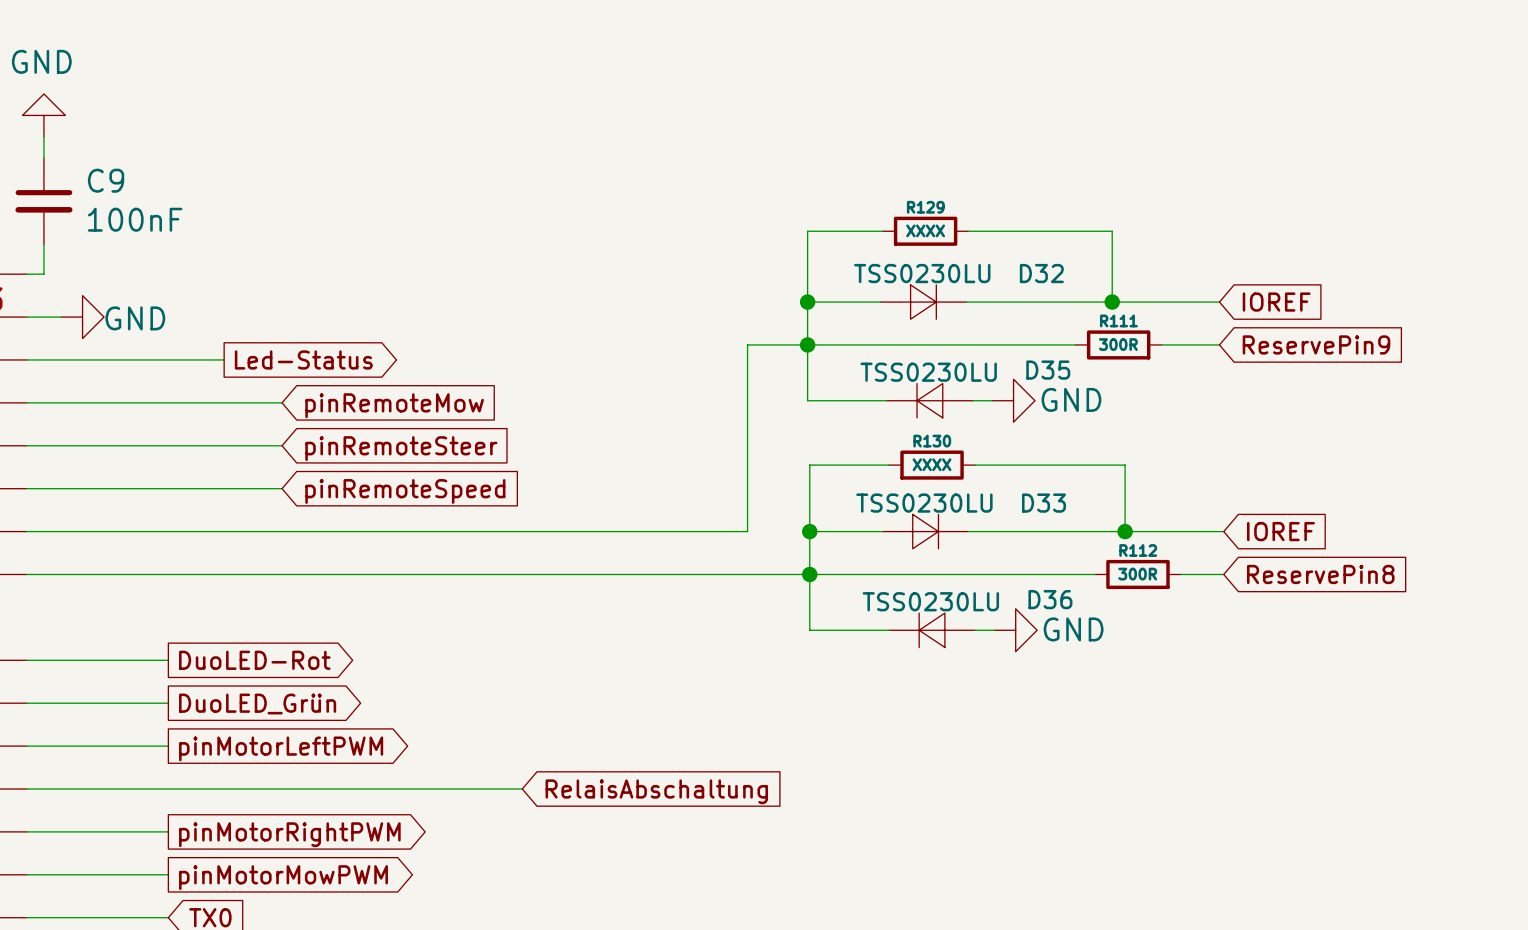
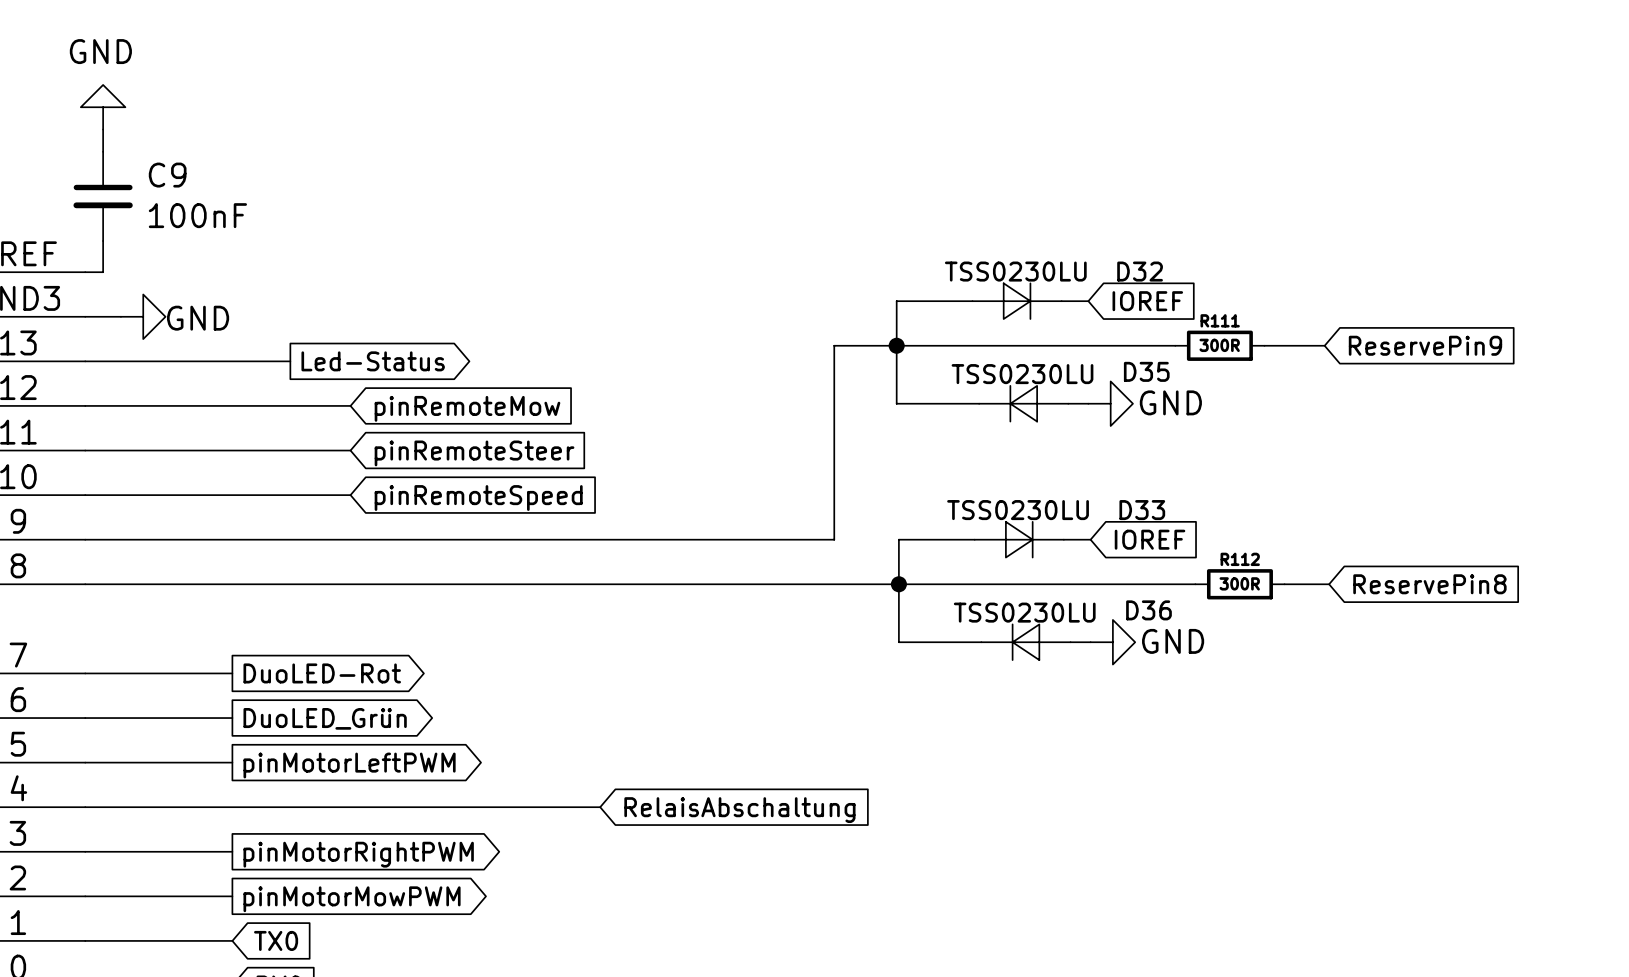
wire: (882, 231) (807, 231) (807, 302) -> none
R129: XXXX (925, 231) -> none
wire: (968, 231) (1112, 231) (1112, 302) -> none
junction: (807, 302) -> none
wire: (992, 302) (1219, 302) -> none
global label: none -> IOREF (1147, 301)
junction: (1112, 302) -> none
global label: IOREF (1276, 302) -> none
wire: (889, 465) (809, 465) (809, 531) -> none
R130: XXXX (932, 465) -> none
wire: (974, 465) (1125, 465) (1125, 531) -> none
junction: (809, 531) -> none
wire: (994, 531) (1223, 531) -> none
global label: none -> IOREF (1150, 539)
junction: (1125, 531) -> none
global label: IOREF (1280, 531) -> none

